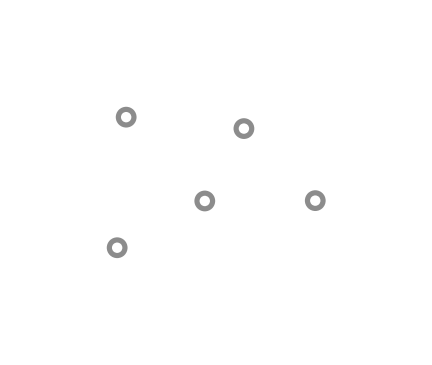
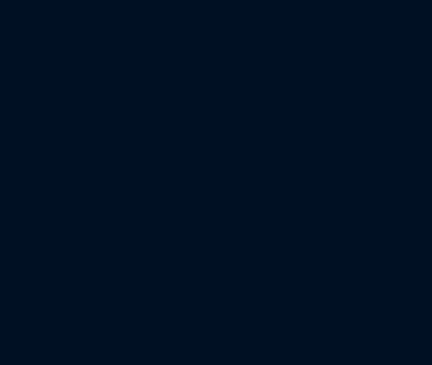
via: (126, 117) -> none
via: (243, 128) -> none
via: (204, 200) -> none
via: (315, 200) -> none
via: (117, 247) -> none

